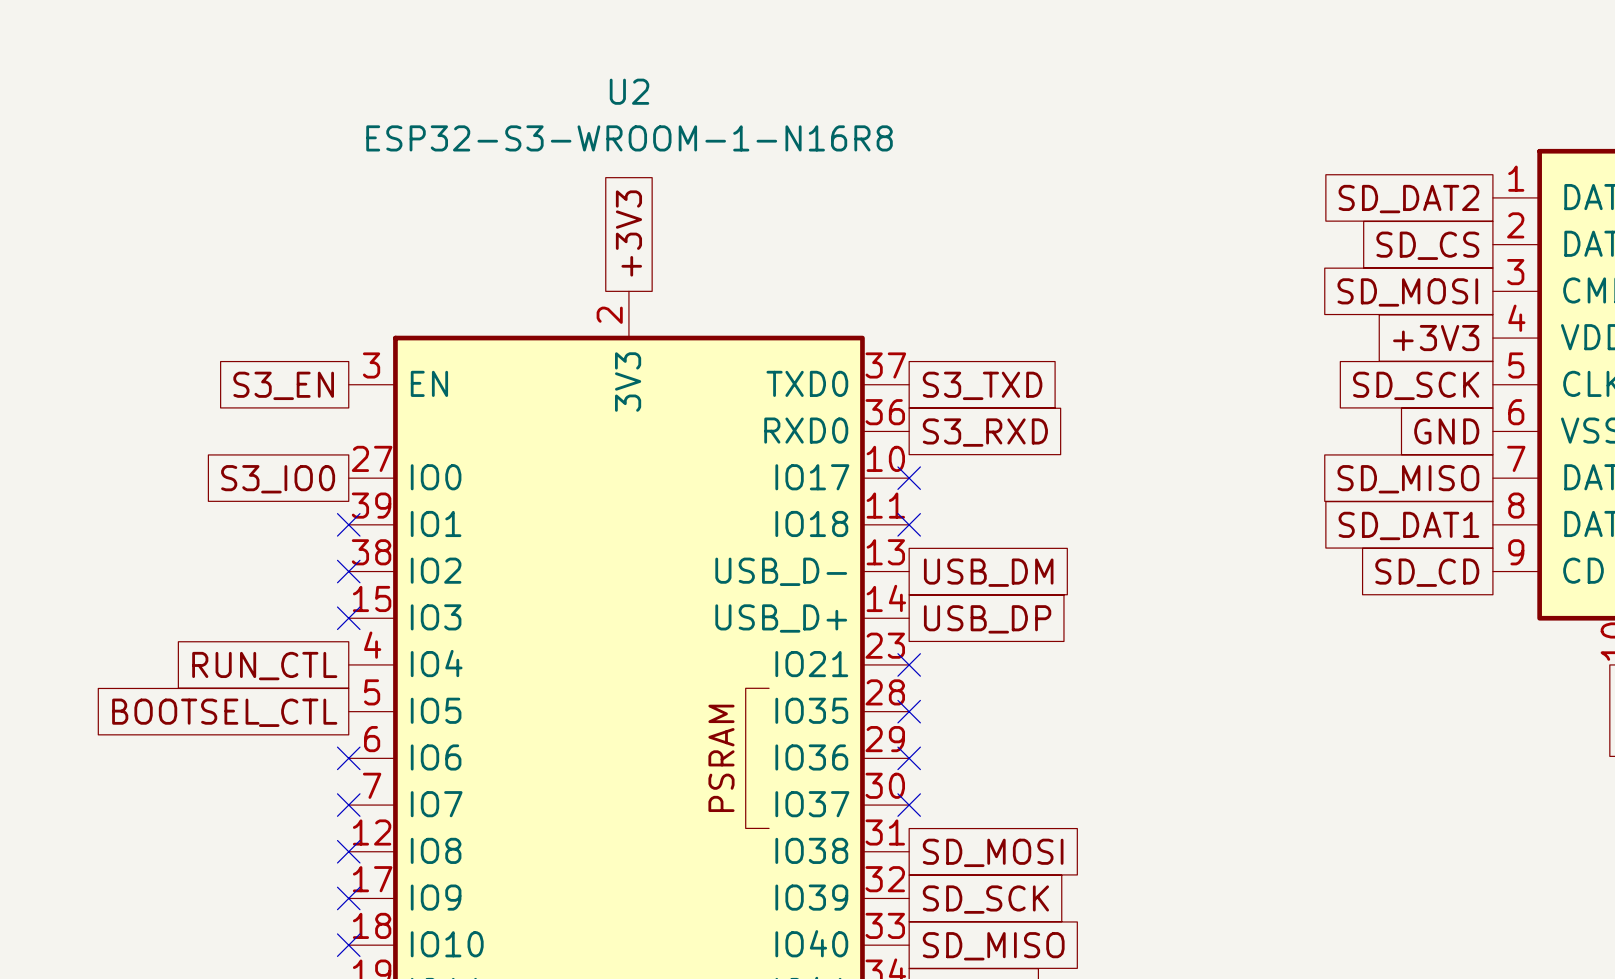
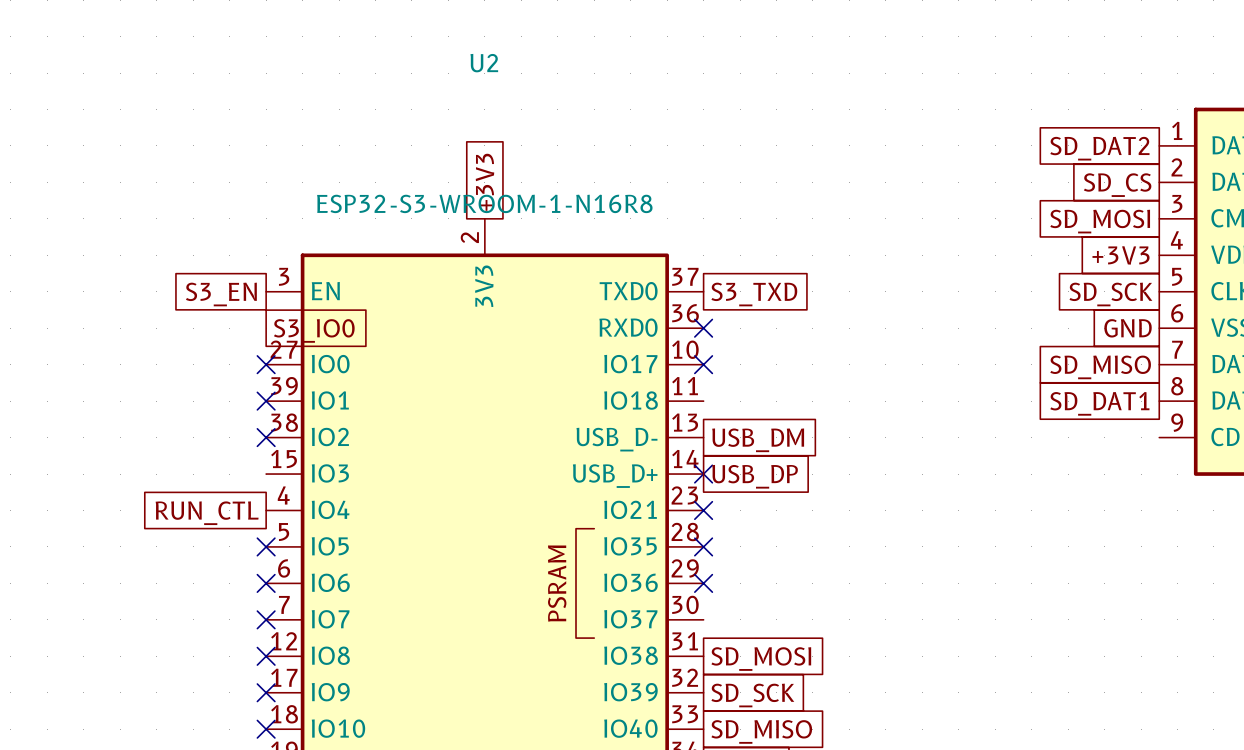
U2 value position: ESP32-S3-WROOM-1-N16R8 (629, 138) -> ESP32-S3-WROOM-1-N16R8 (484, 203)
no-connect mark: none -> (703, 328)
global label: S3_RXD (985, 432) -> none
no-connect mark: none -> (266, 364)
global label rotation: 0° (278, 479) -> 180° (314, 330)
global label position: S3_IO0 (278, 479) -> S3_IO0 (314, 330)
no-connect mark: (909, 524) -> none
global label: SD_CD (1427, 572) -> none
no-connect mark: (348, 618) -> none
no-connect mark: none -> (703, 474)
no-connect mark: none -> (266, 546)
global label: BOOTSEL_CTL (224, 712) -> none
no-connect mark: (909, 805) -> none

